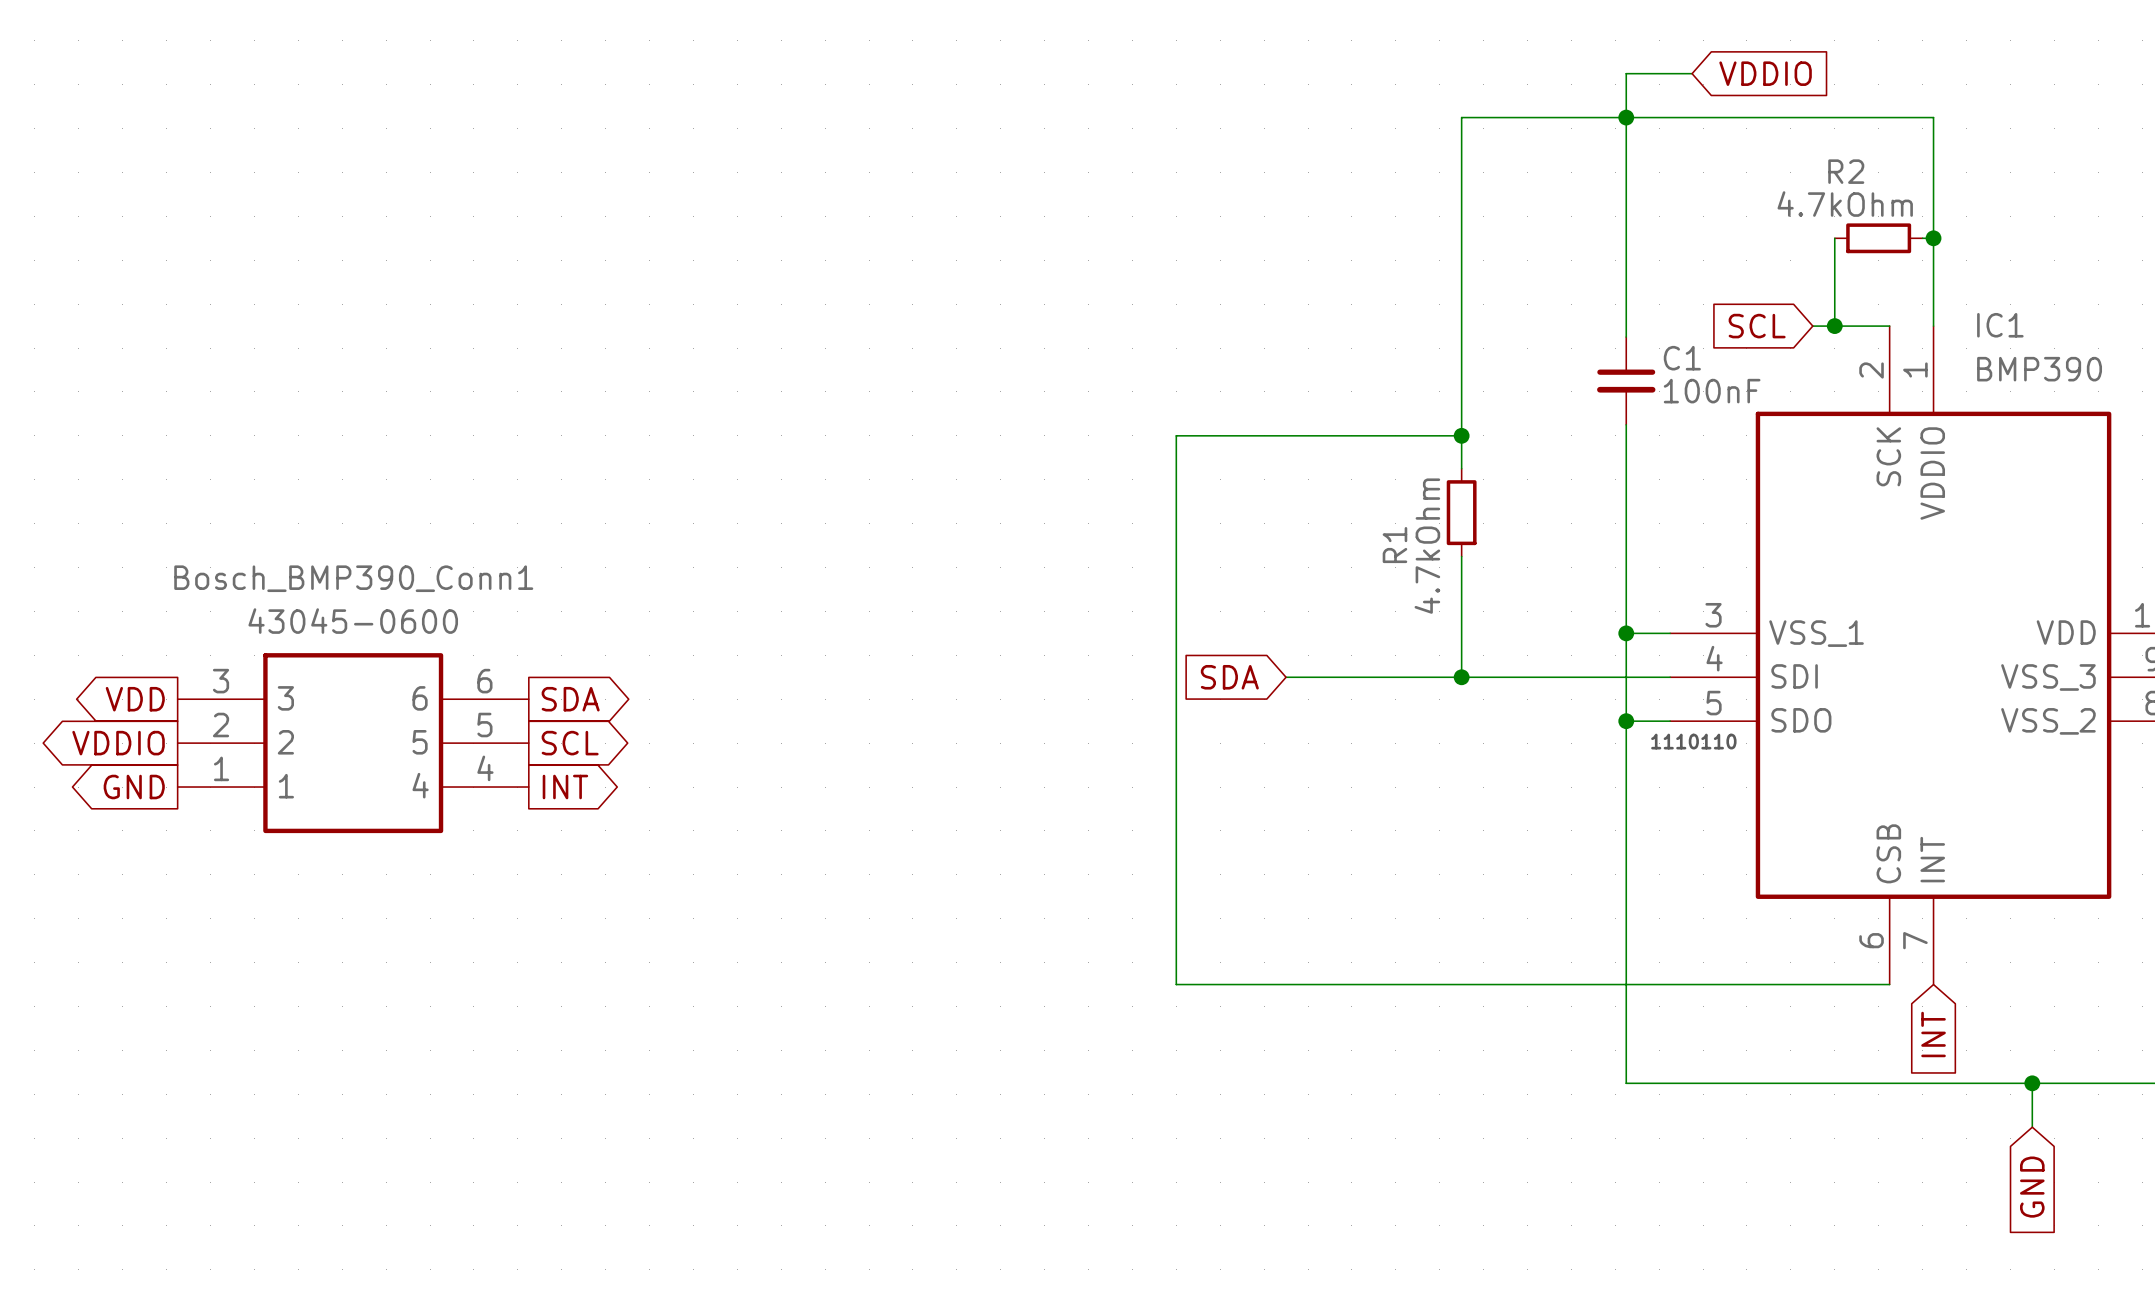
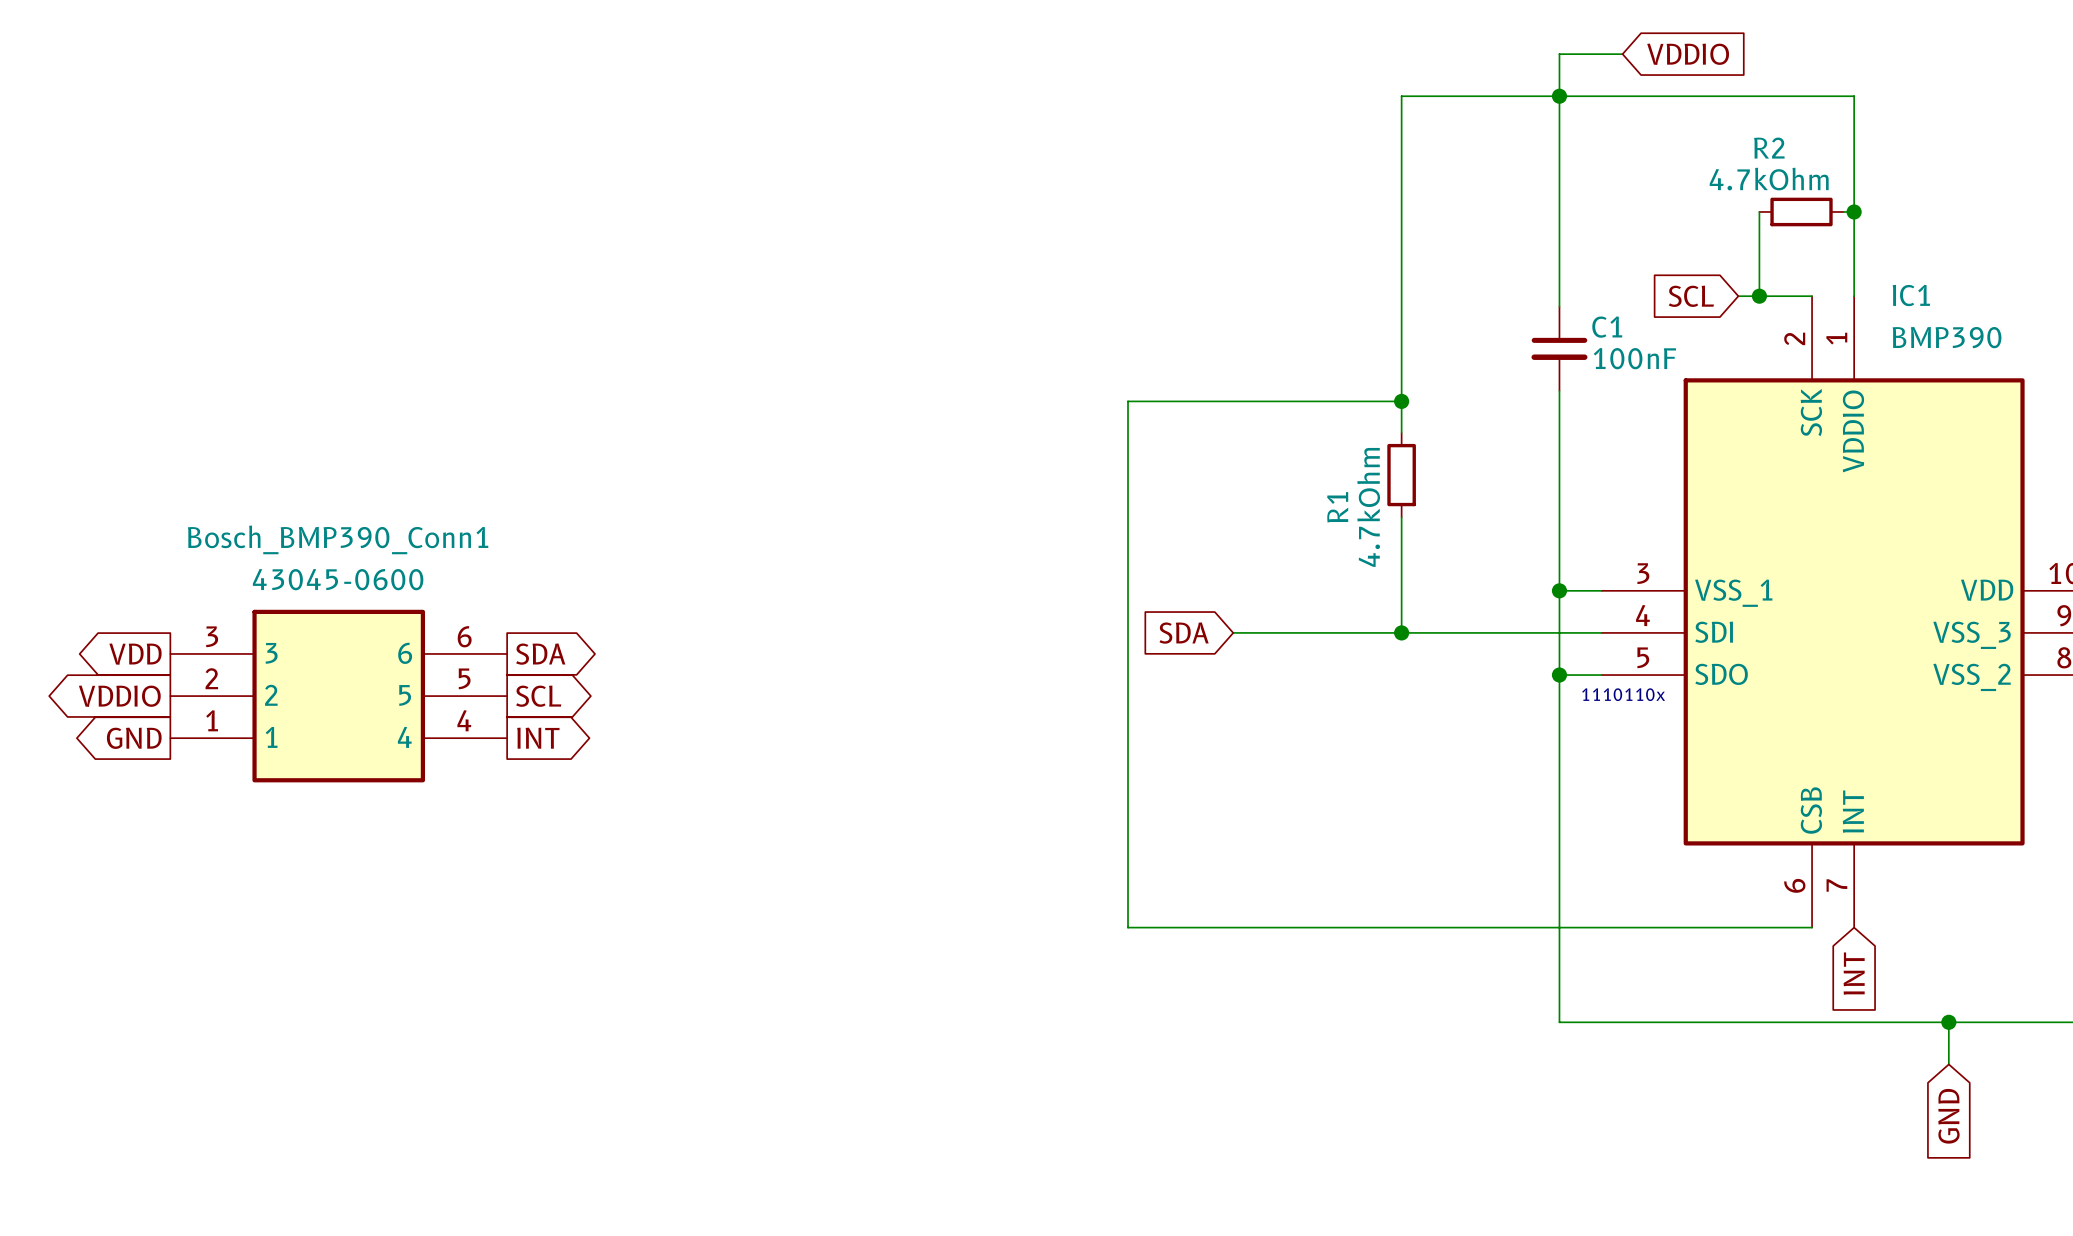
text: 1110110 (1693, 741) -> 1110110x (1623, 694)

